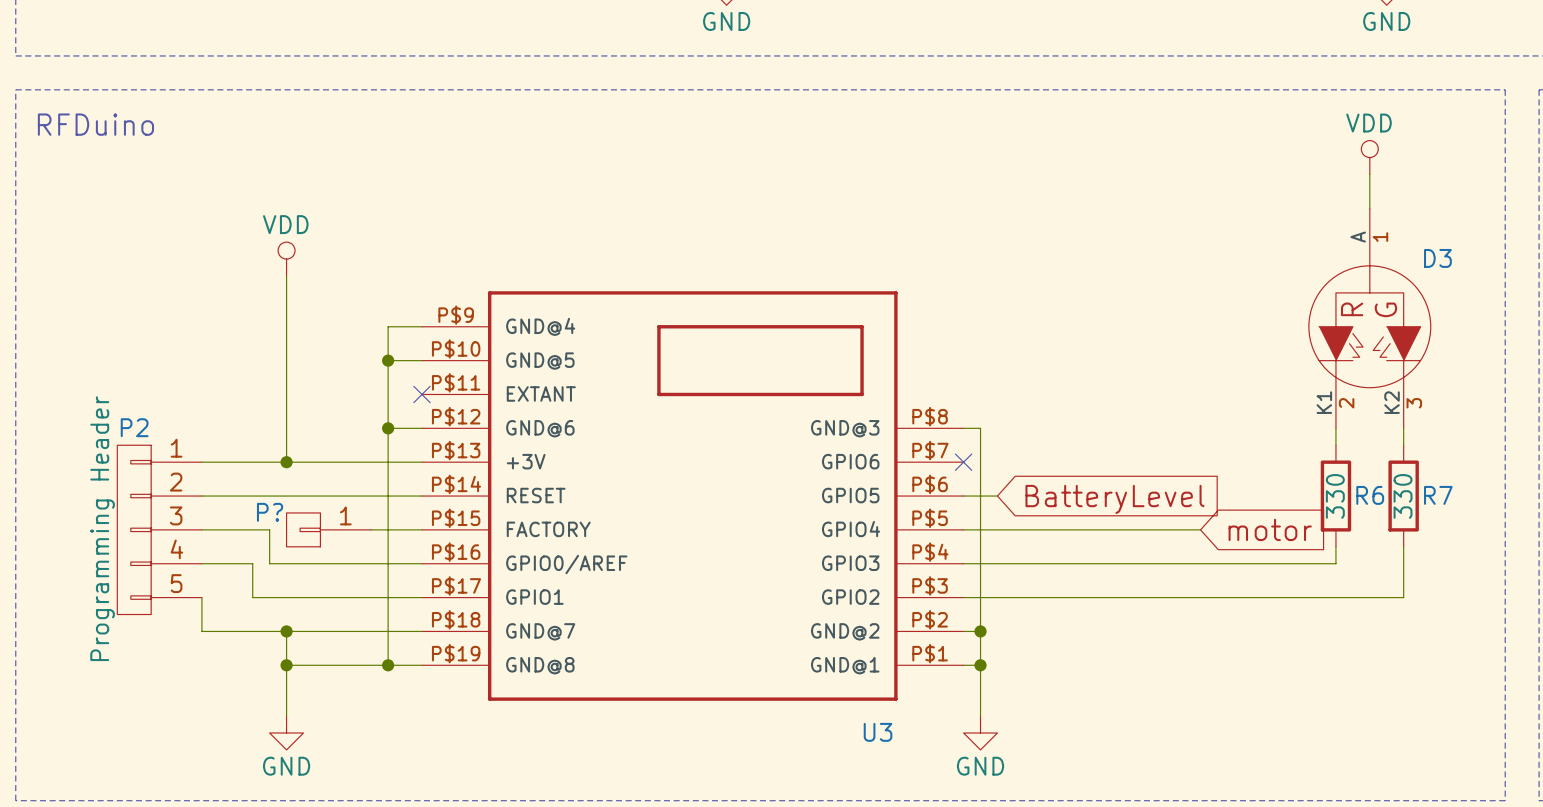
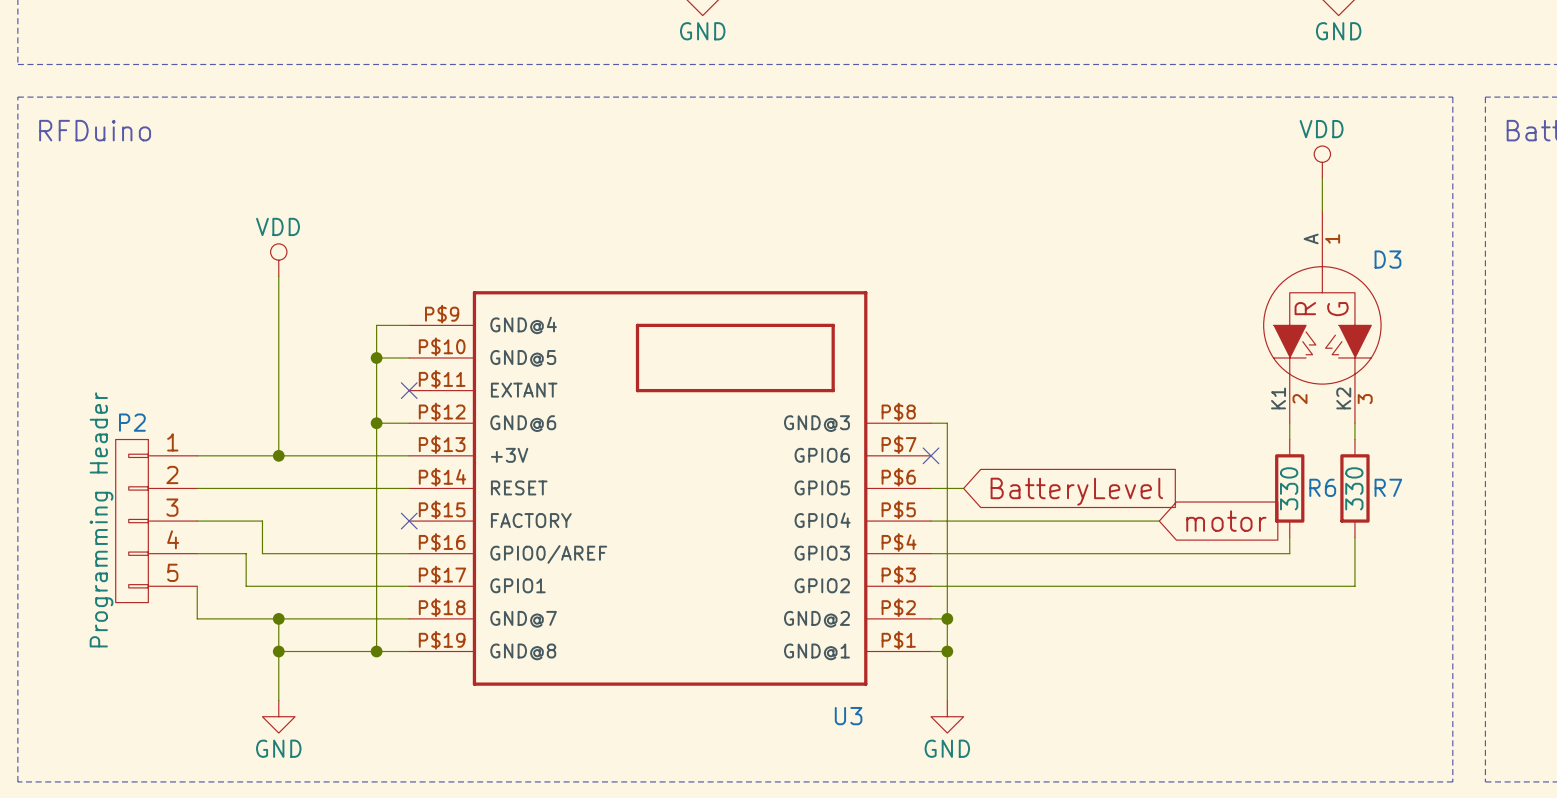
P?: (328, 529) -> none
wire: (371, 529) (421, 529) -> none
no-connect mark: none -> (409, 521)

